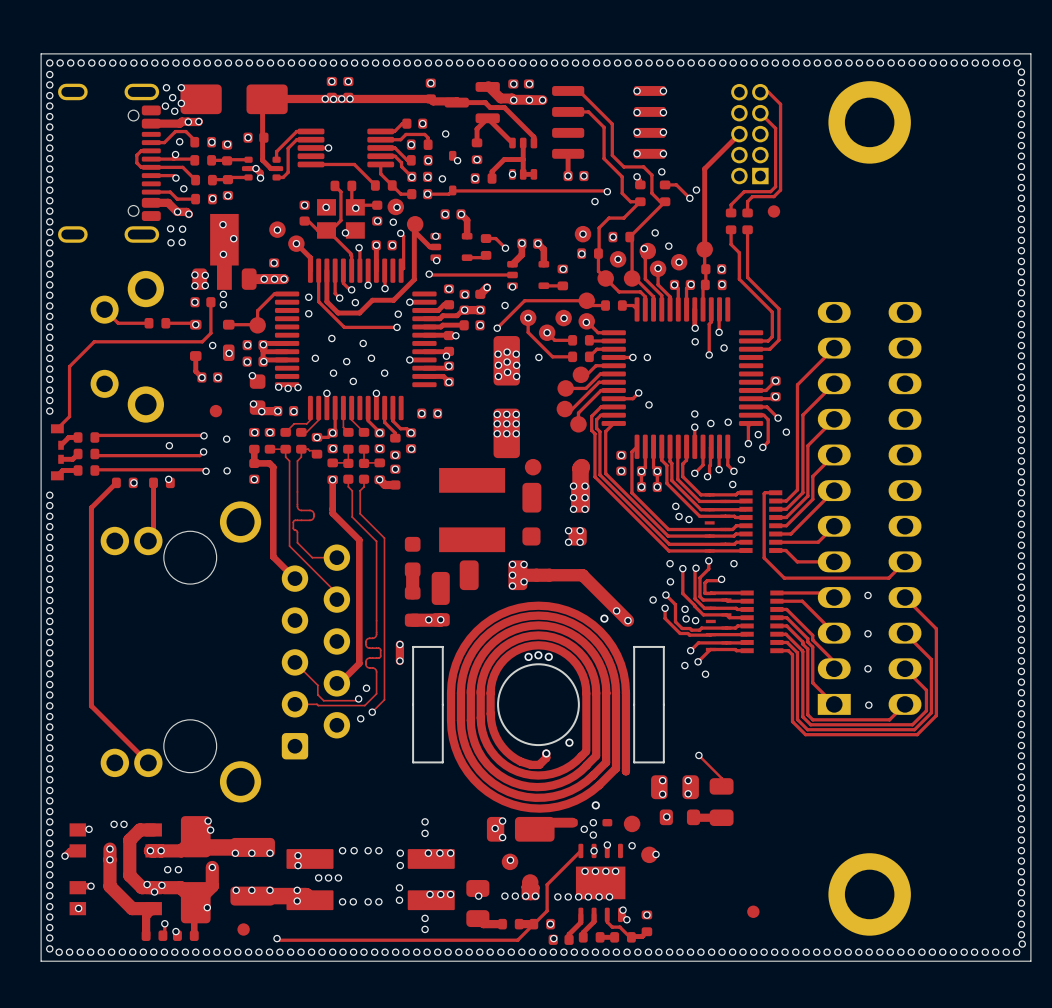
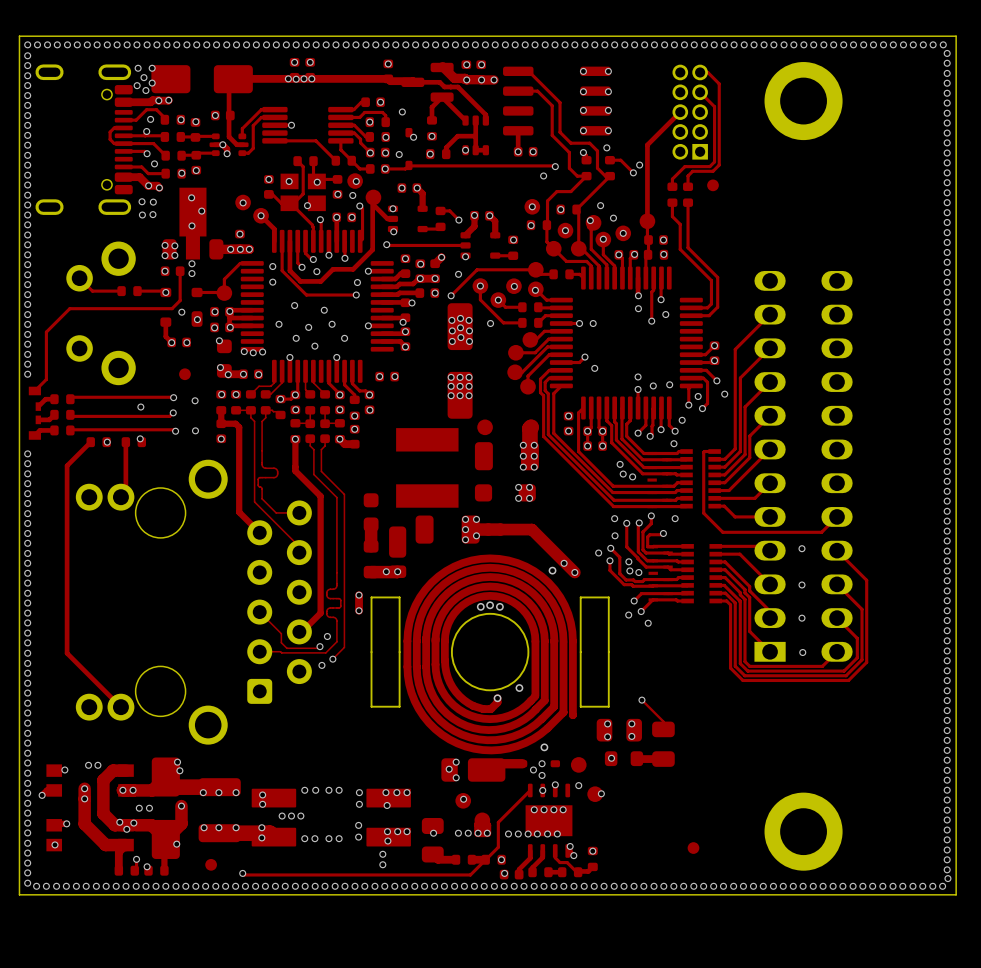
via: (425, 821) -> none
via: (425, 833) -> none
via: none -> (387, 805)
via: none -> (387, 841)

